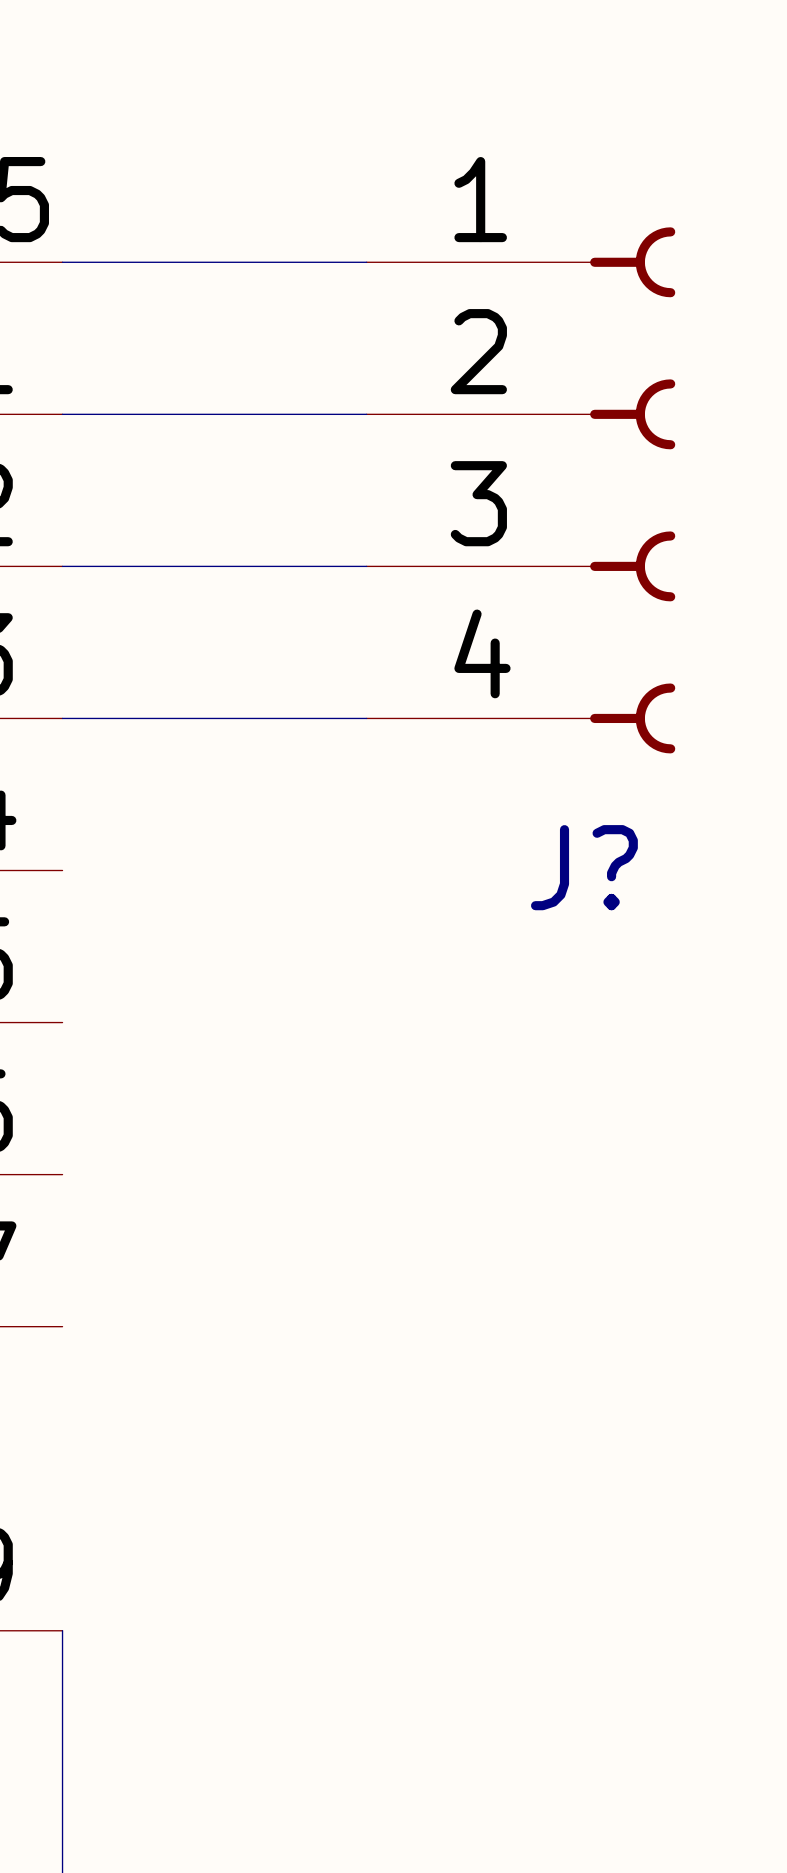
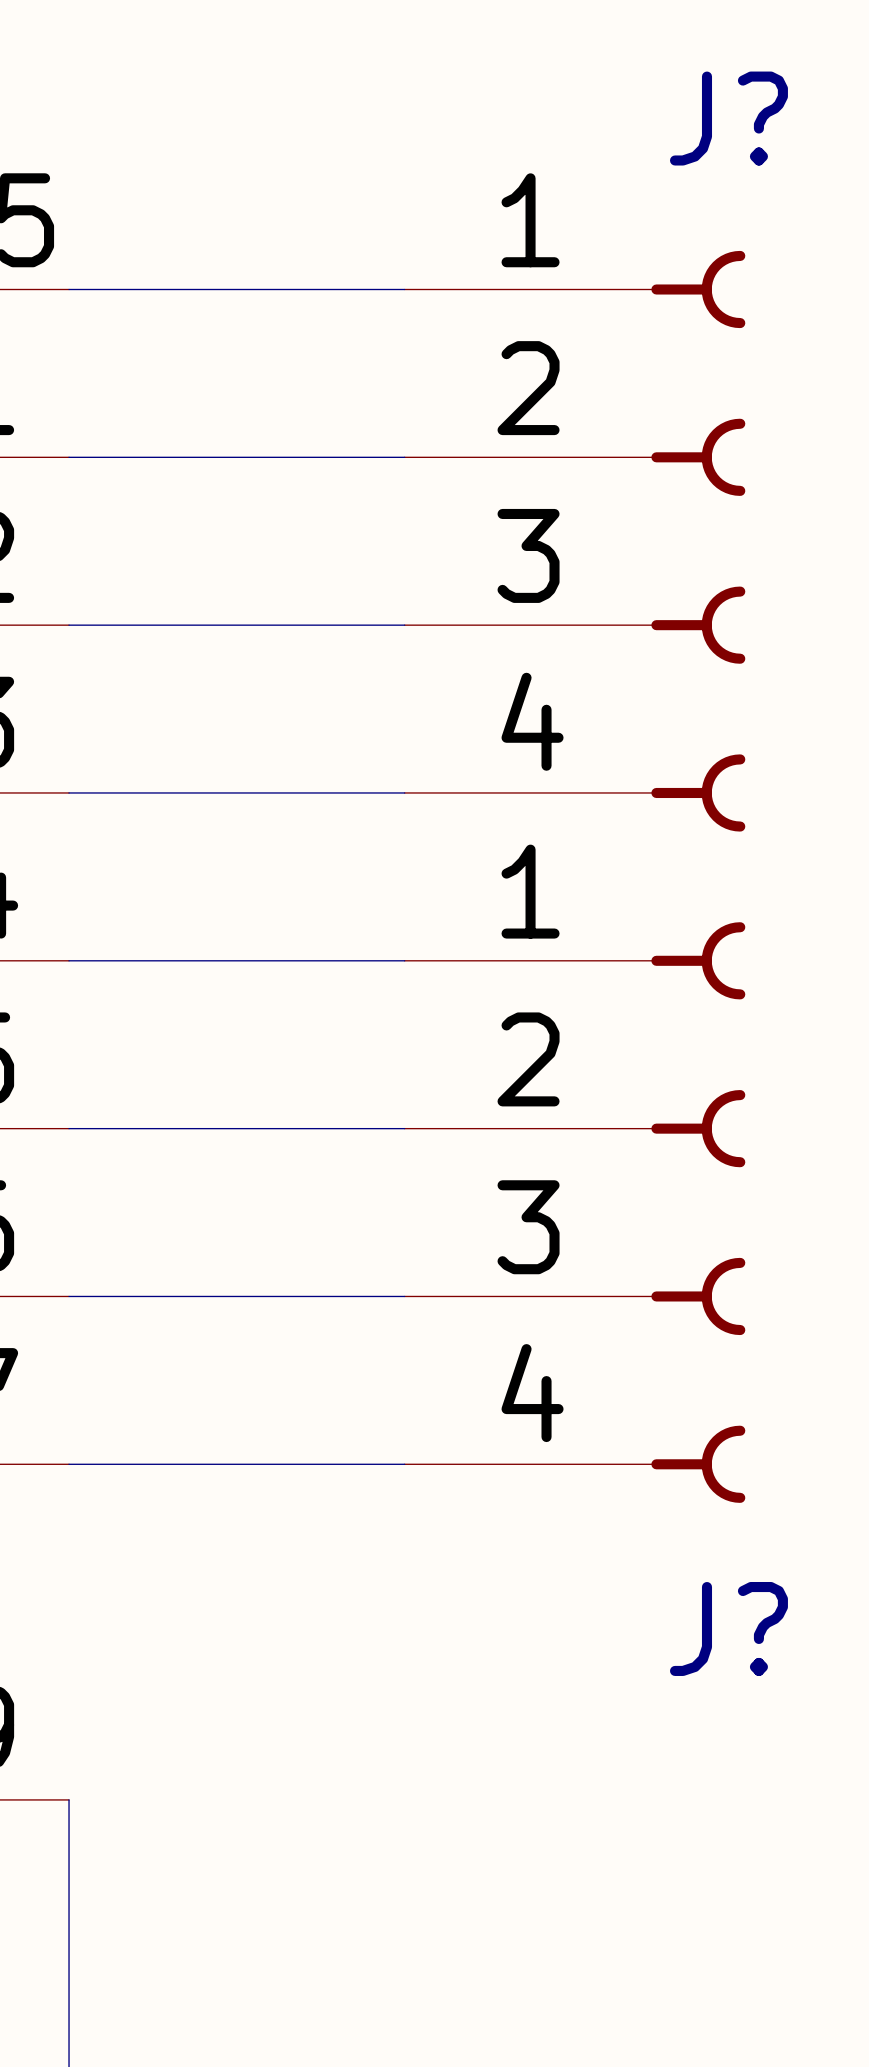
J? name position: J? (584, 867) -> J? (728, 118)
wire: none -> (69, 960) (404, 960)
wire: none -> (69, 1128) (404, 1128)
J?: none -> (574, 1212)
wire: none -> (69, 1296) (404, 1296)
wire: none -> (69, 1464) (404, 1464)

